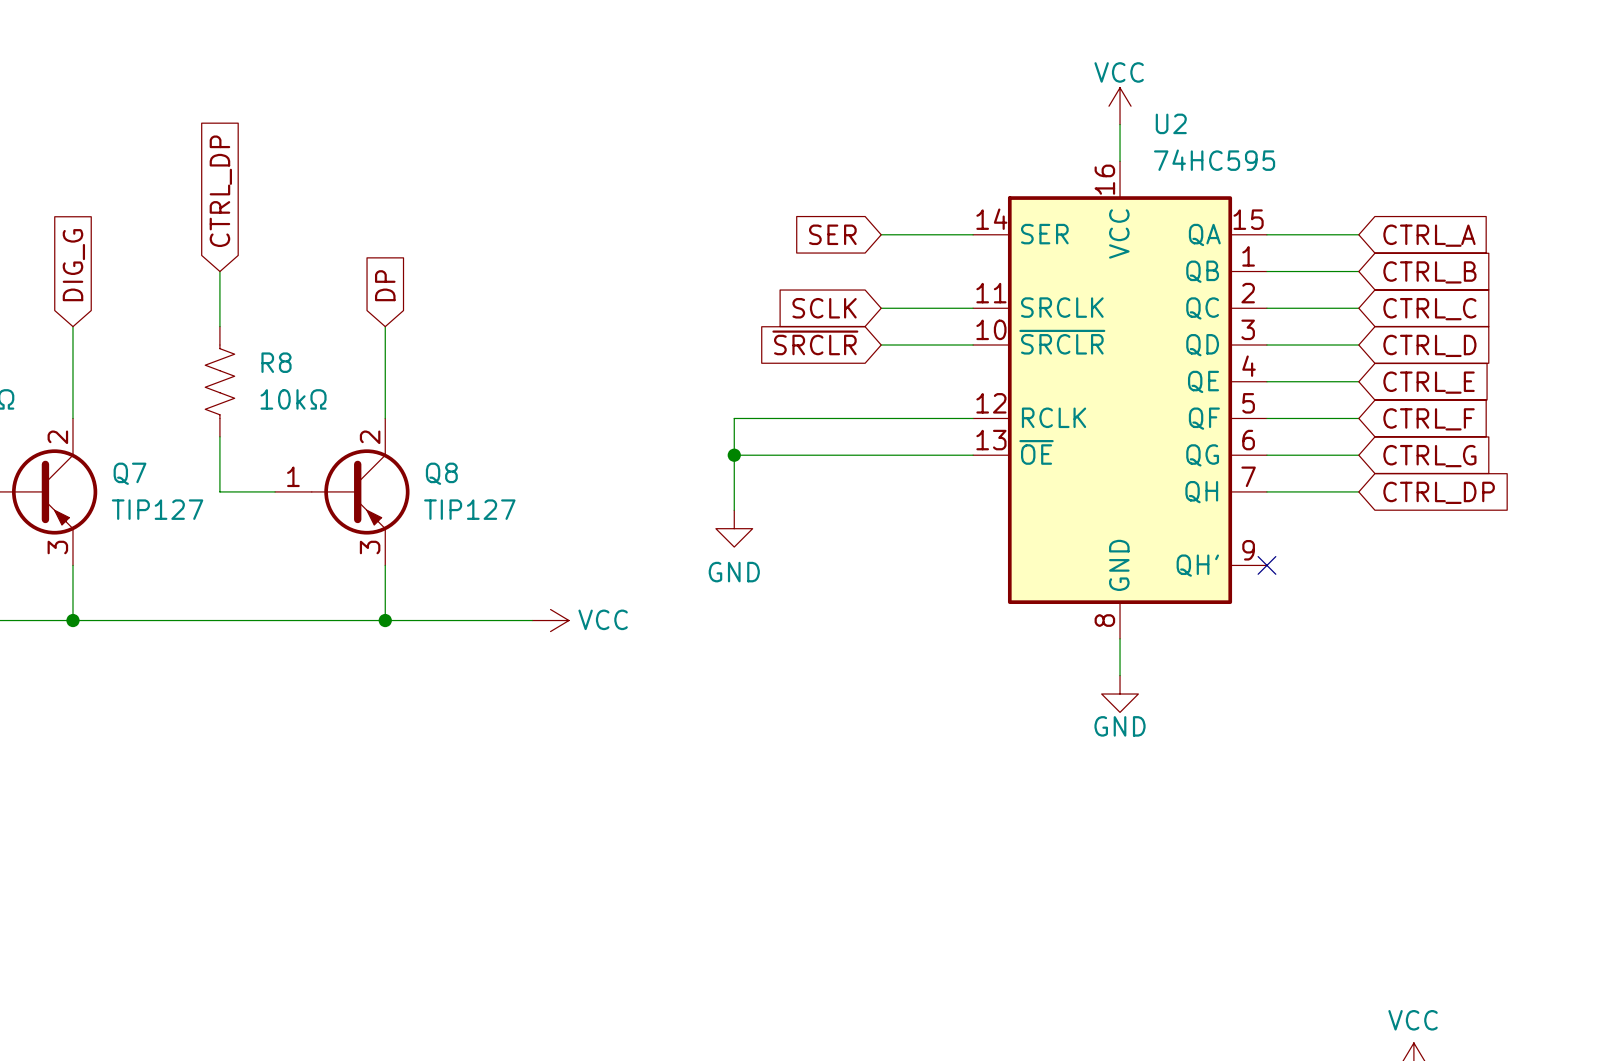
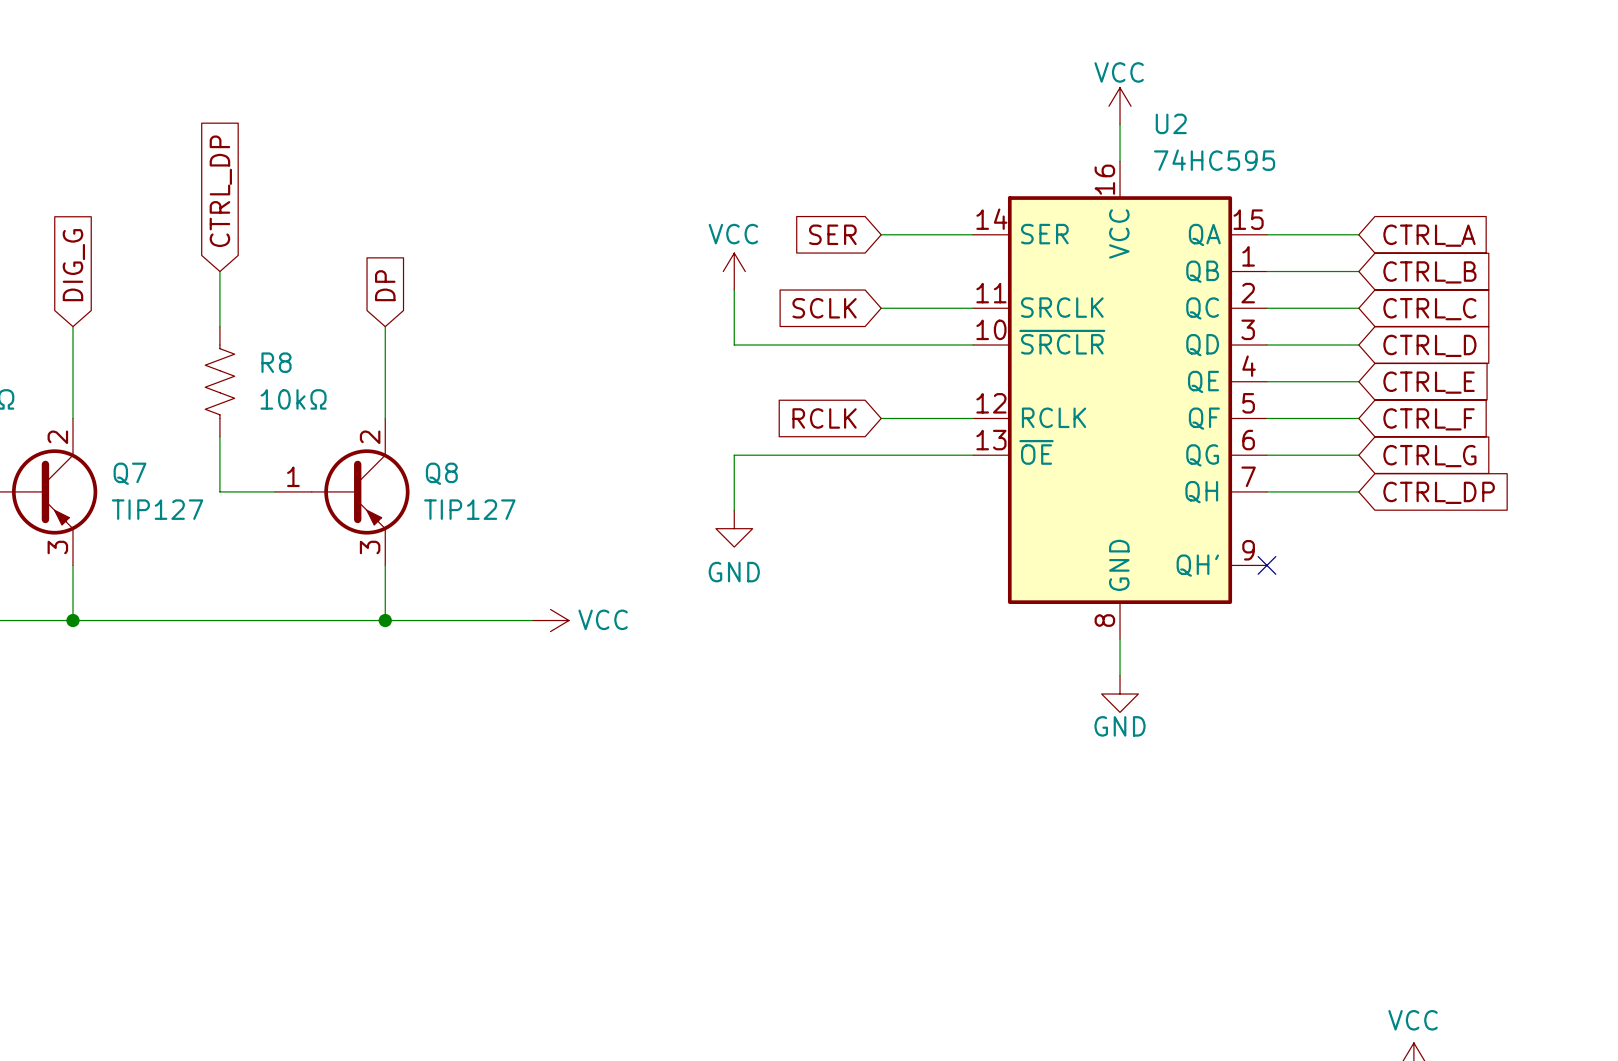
power symbol: none -> VCC (734, 271)
wire: none -> (734, 289) (734, 345) (881, 345)
global label: ~{SRCLR} (815, 342) -> none
global label: none -> RCLK (824, 418)
wire: (881, 418) (734, 418) (734, 455) -> none
junction: (734, 455) -> none

